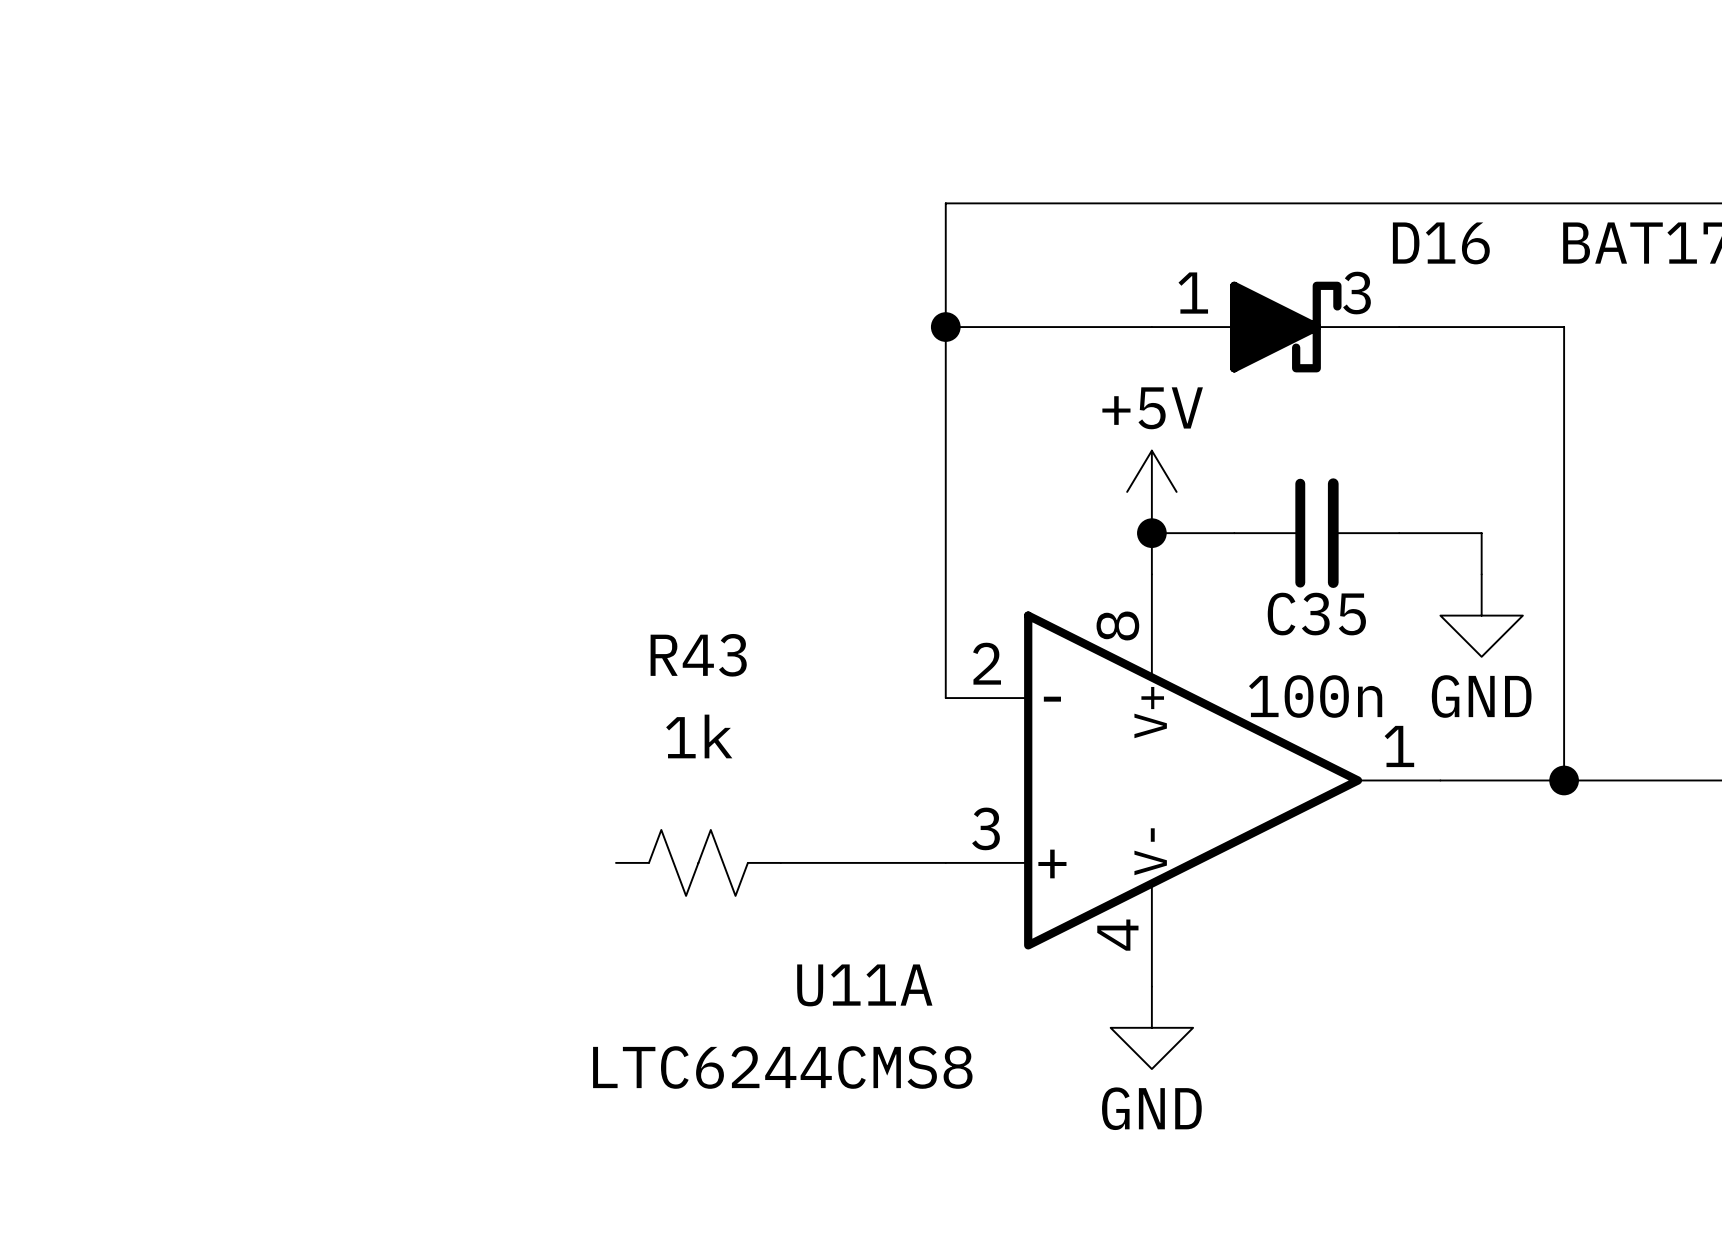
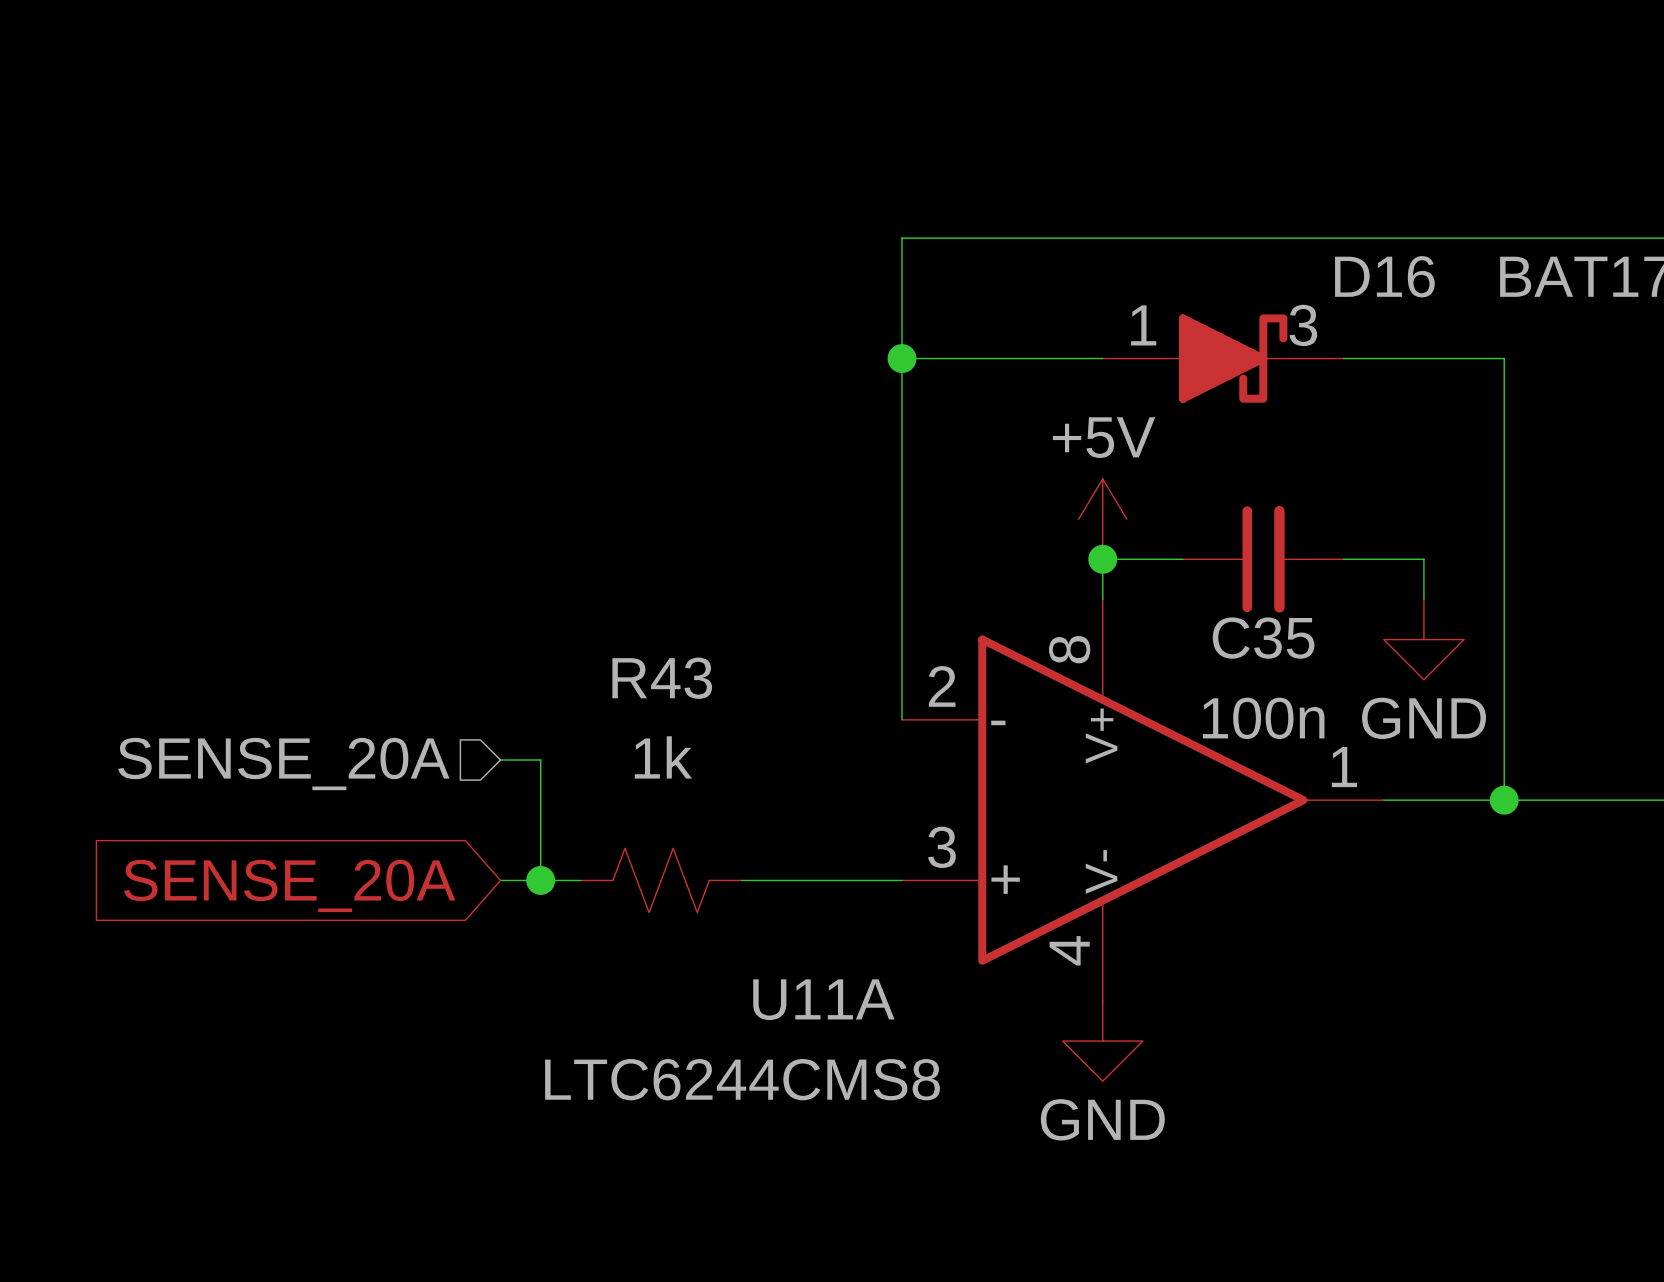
wire: none -> (500, 760) (540, 760) (540, 880)
hierarchical label: none -> SENSE_20A (283, 764)
wire: none -> (500, 880) (580, 880)
junction: none -> (540, 880)
global label: none -> SENSE_20A (289, 885)

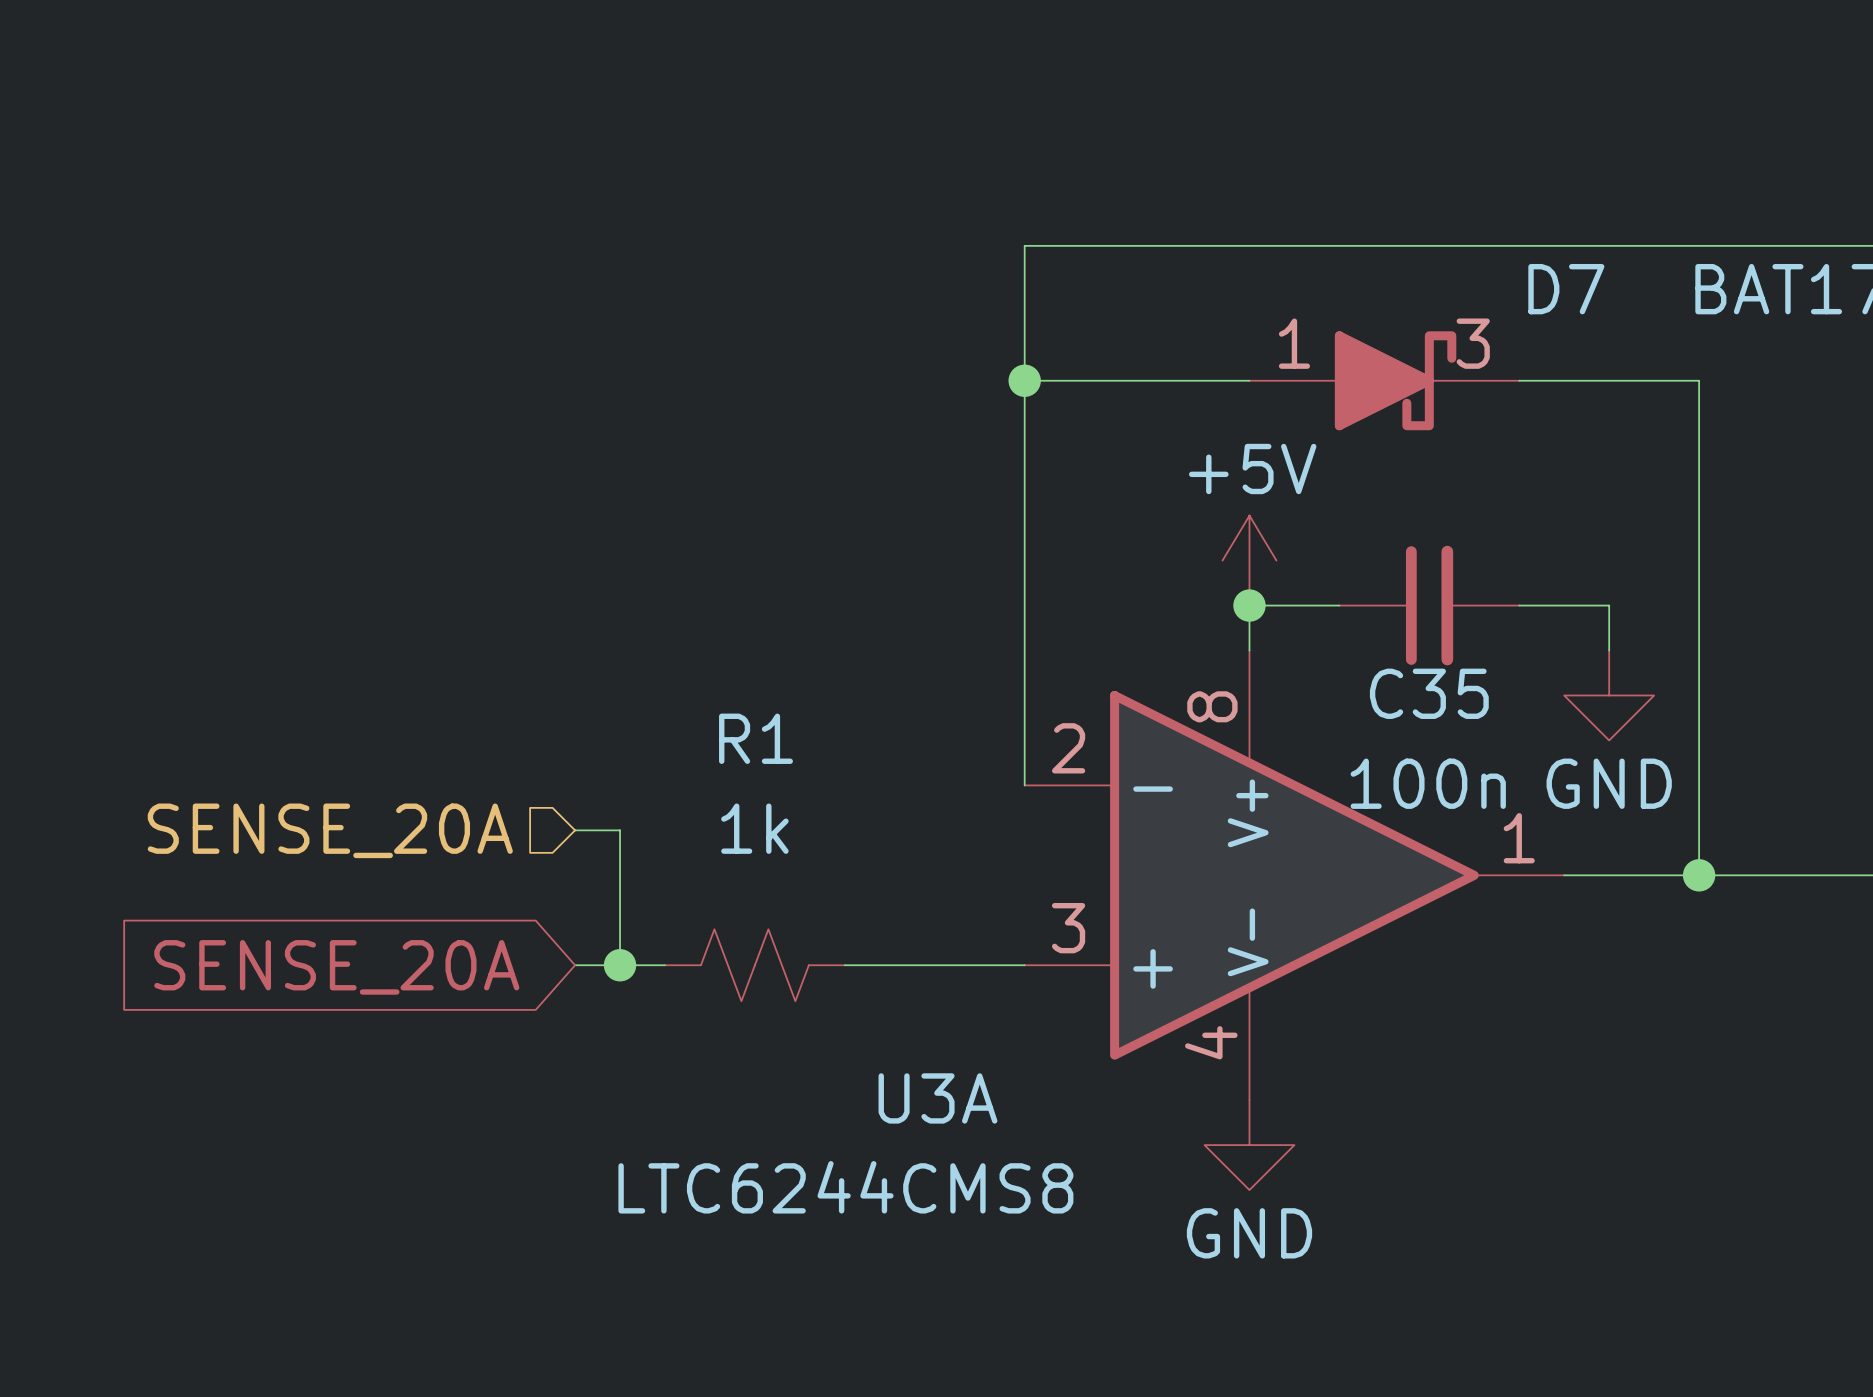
D16 name: D16 (1384, 276) -> D7 (1566, 289)
R43 name: R43 (662, 678) -> R1 (755, 738)
U11A name: U11A (823, 999) -> U3A (937, 1098)

